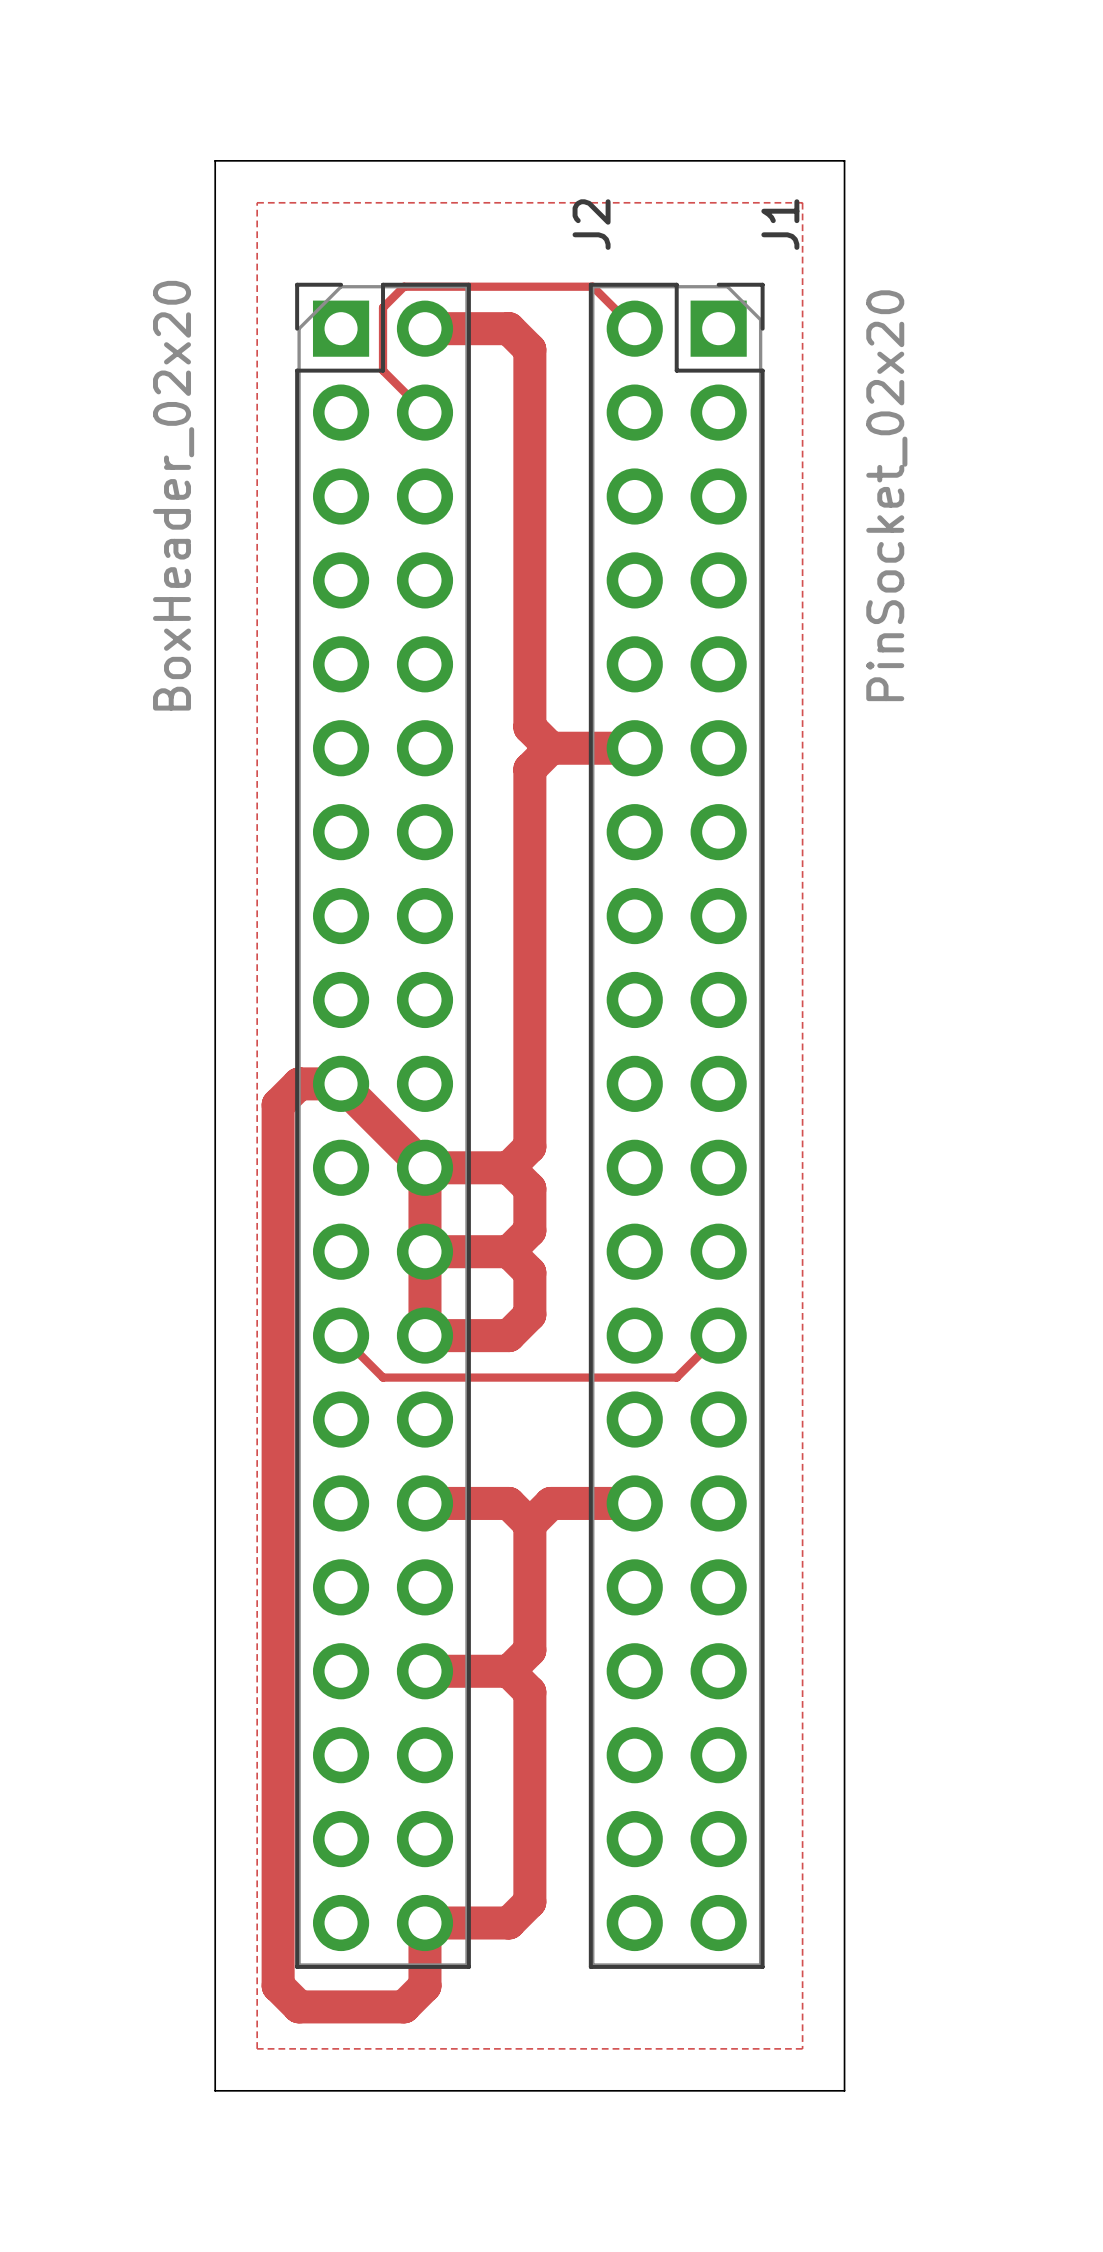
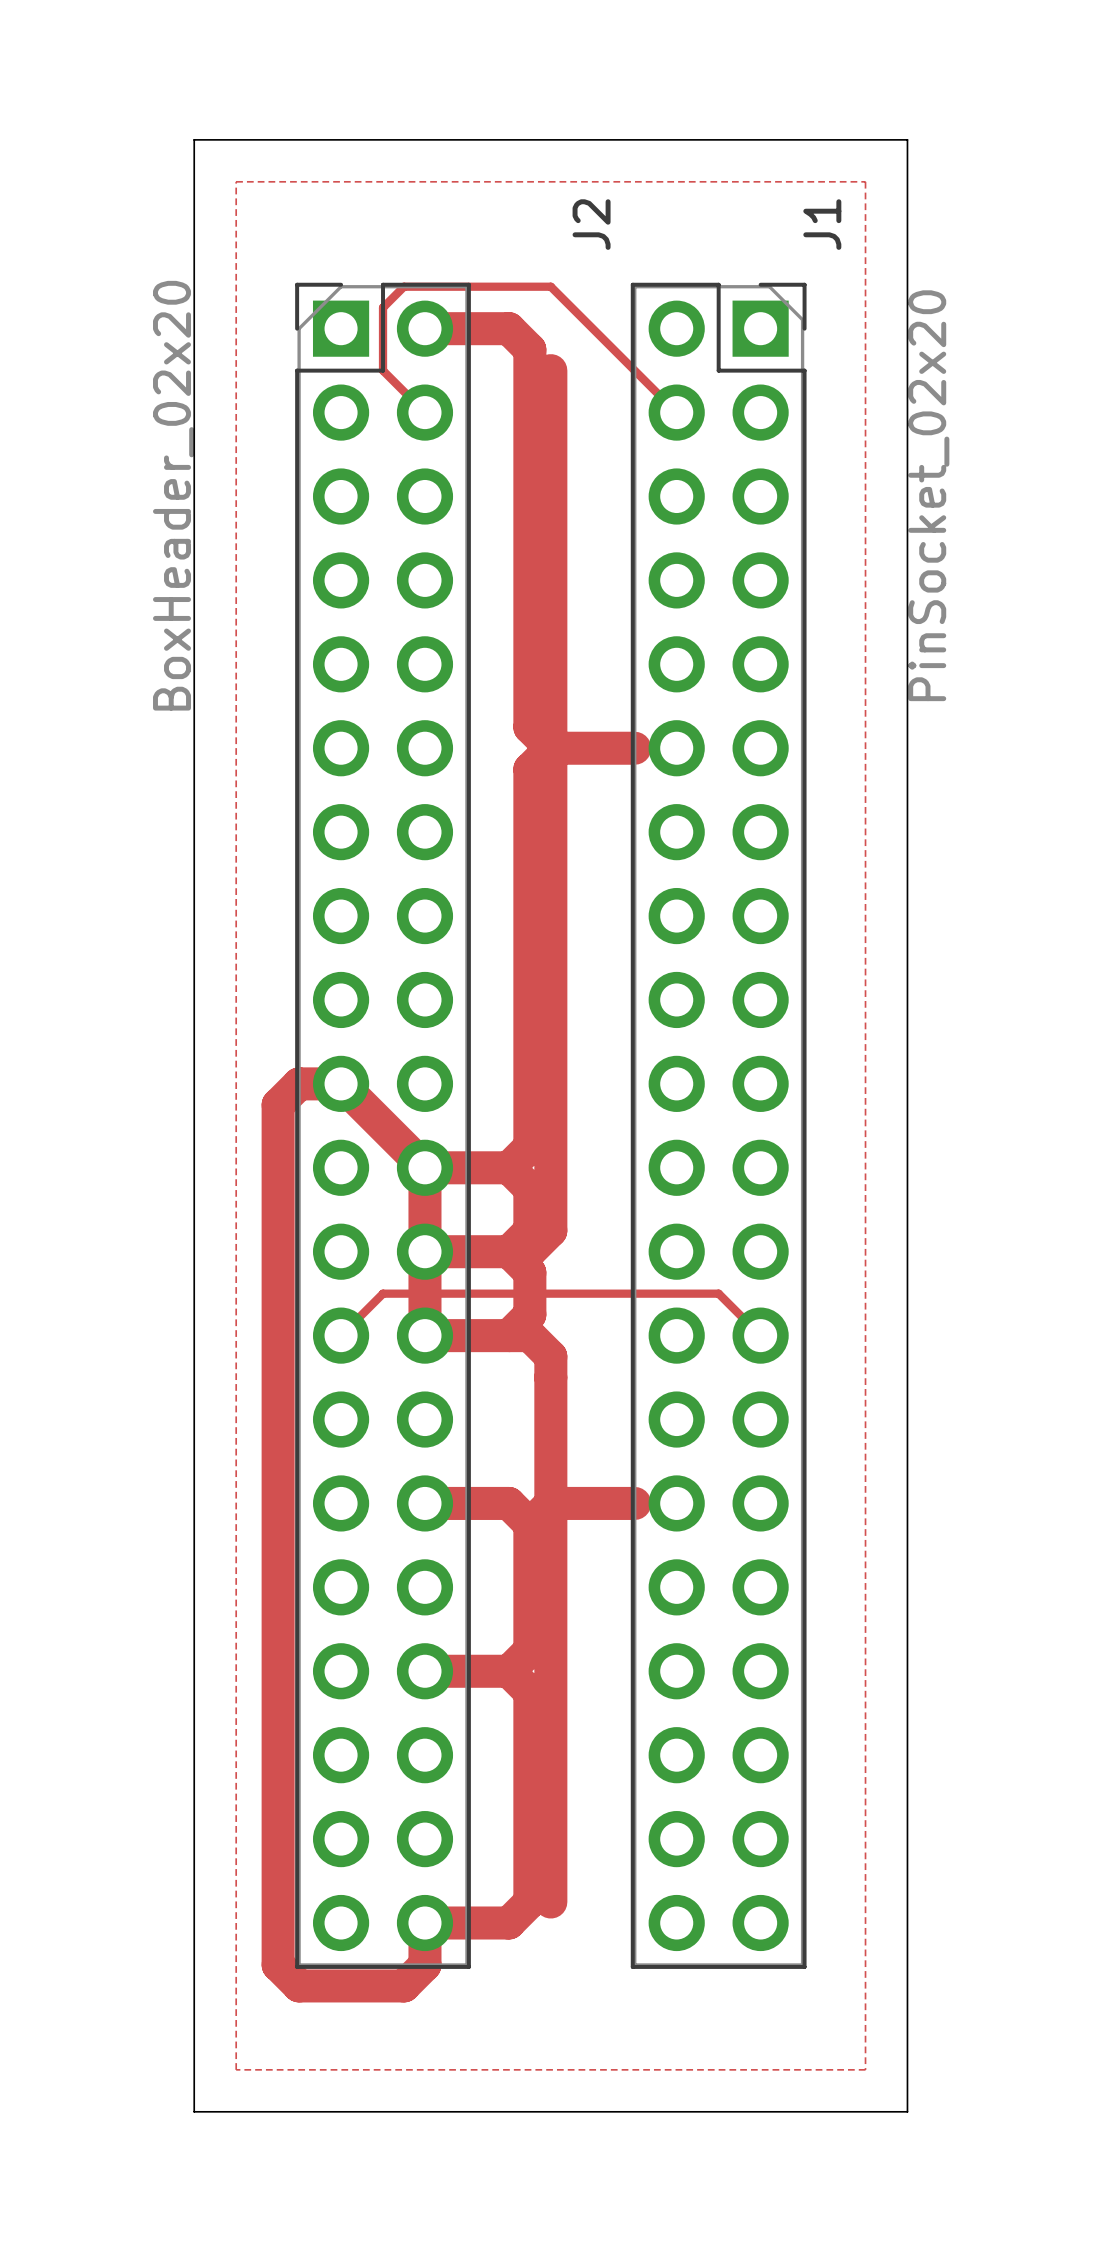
board edge: (215, 160) (844, 160) (844, 2090) (215, 2090) (215, 160) -> (194, 139) (194, 2111) (907, 2111) (907, 139) (194, 139)
zone outline: (257, 202) (802, 202) (802, 2048) (257, 2048) (257, 202) -> (236, 181) (236, 2069) (865, 2069) (865, 181) (236, 181)
track: (550, 286) (592, 286) (634, 328) -> (550, 286) (676, 412)
track: none -> (550, 1125) (550, 370) (550, 1230) (529, 1251) (508, 1251)
J1 position: (676, 1125) -> (718, 1125)
track: (341, 1335) (383, 1377) (676, 1377) (718, 1335) -> (341, 1335) (383, 1293) (718, 1293) (760, 1335)
track: none -> (508, 1335) (529, 1335) (550, 1356) (550, 1902)
track: (278, 1964) (278, 1985) (299, 2006) (404, 2006) (424, 1985) (424, 1964) -> (278, 1964) (299, 1985) (404, 1985) (424, 1964)

